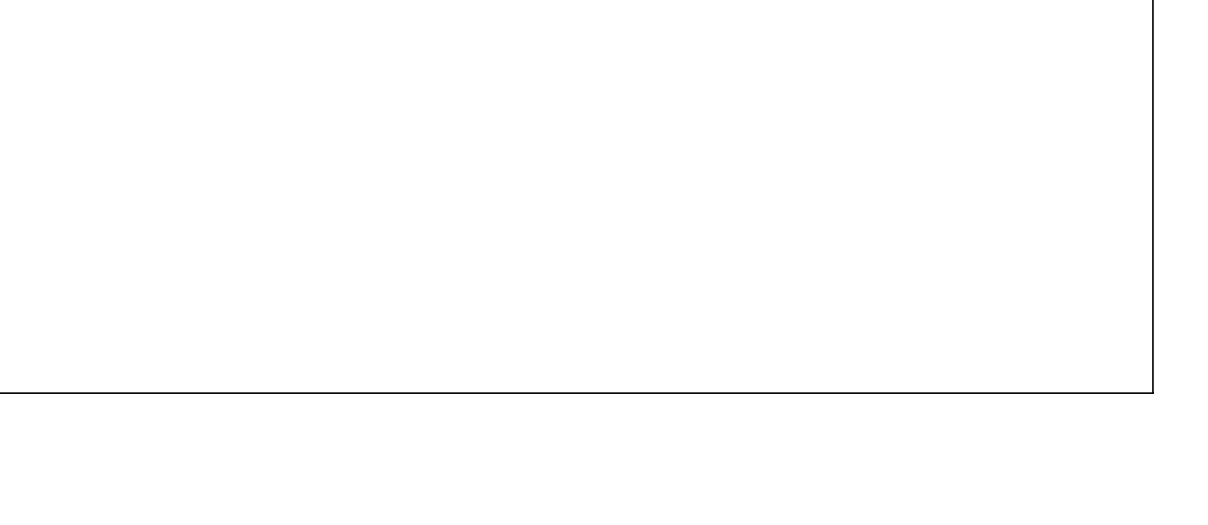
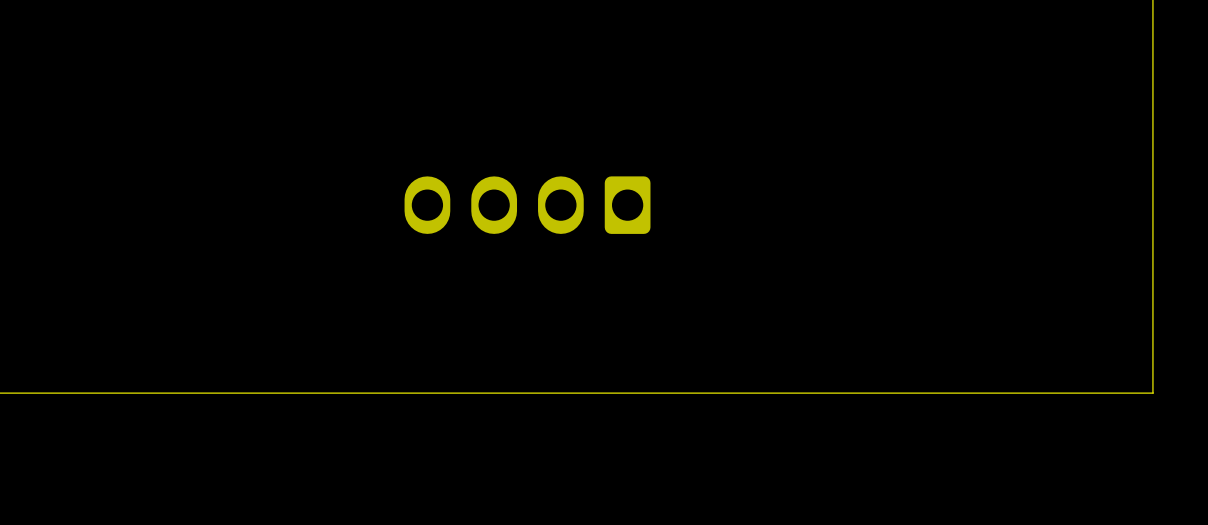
part: none -> (527, 205)

